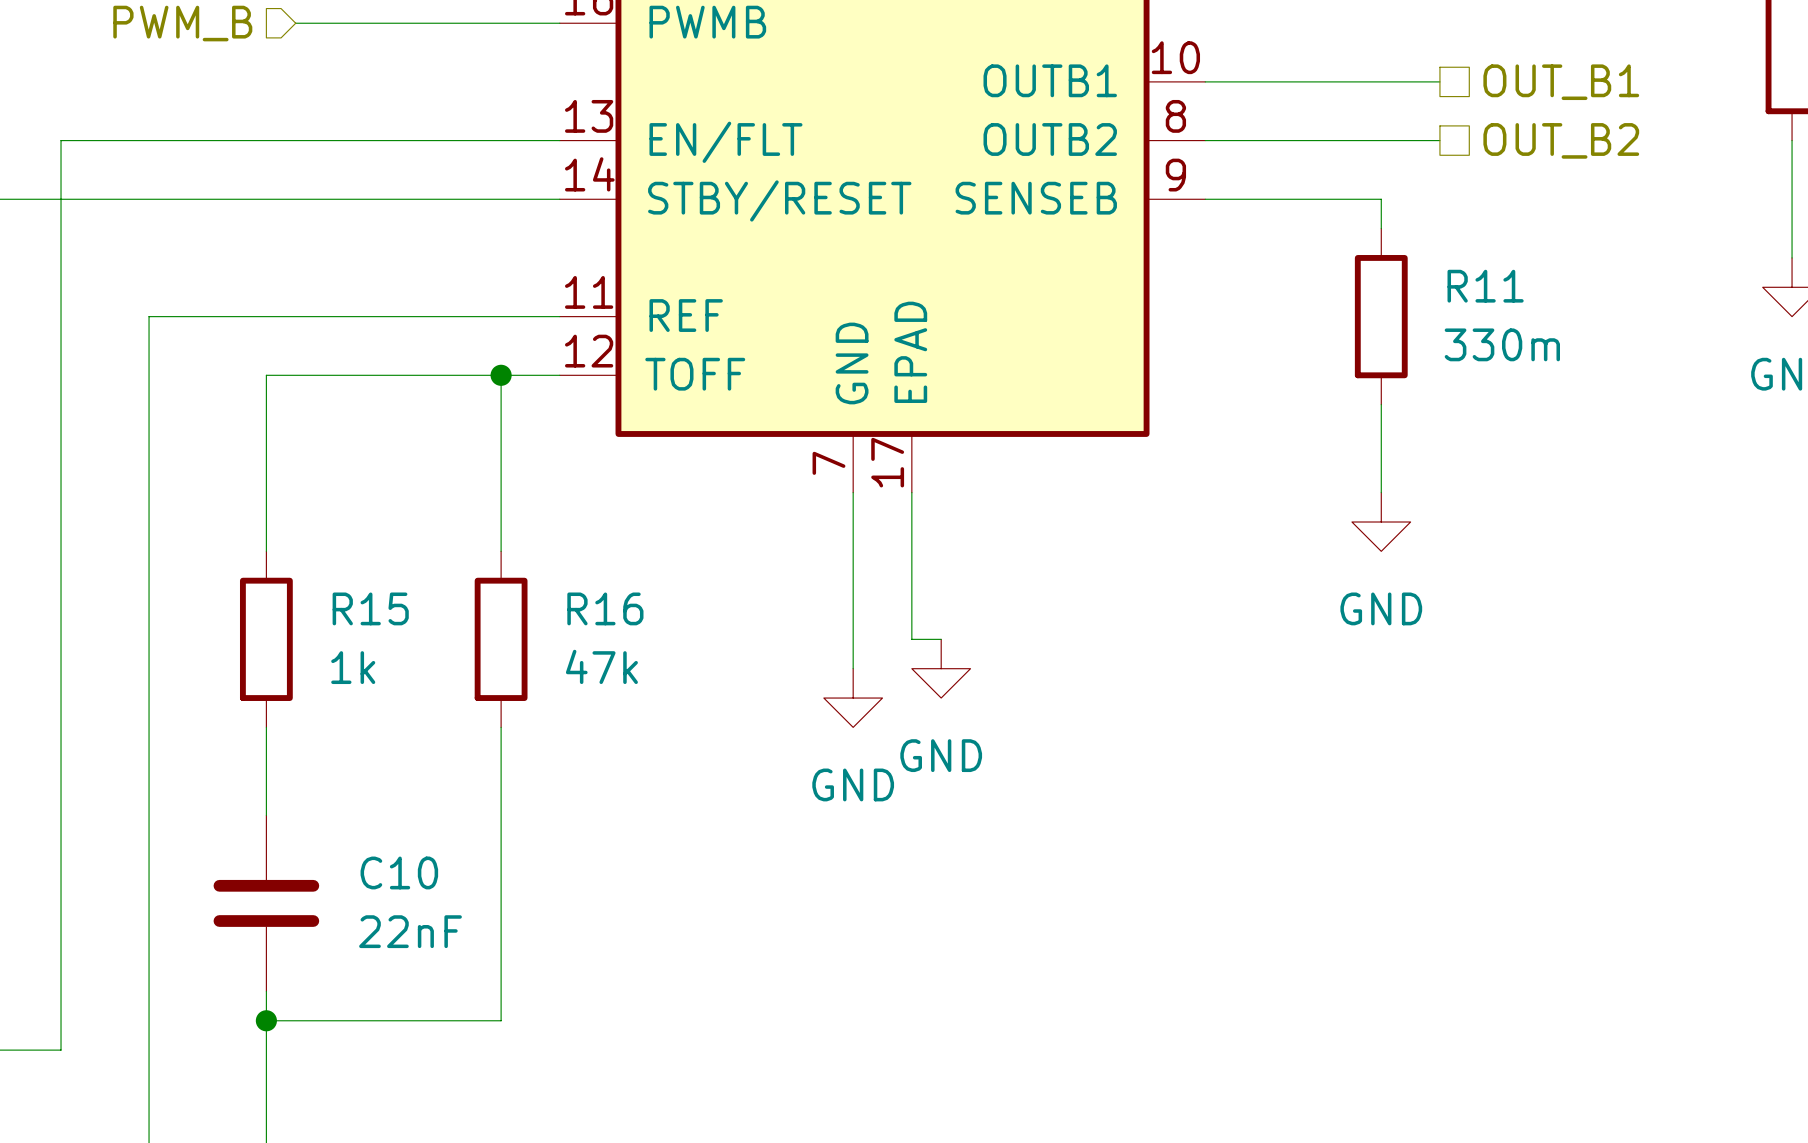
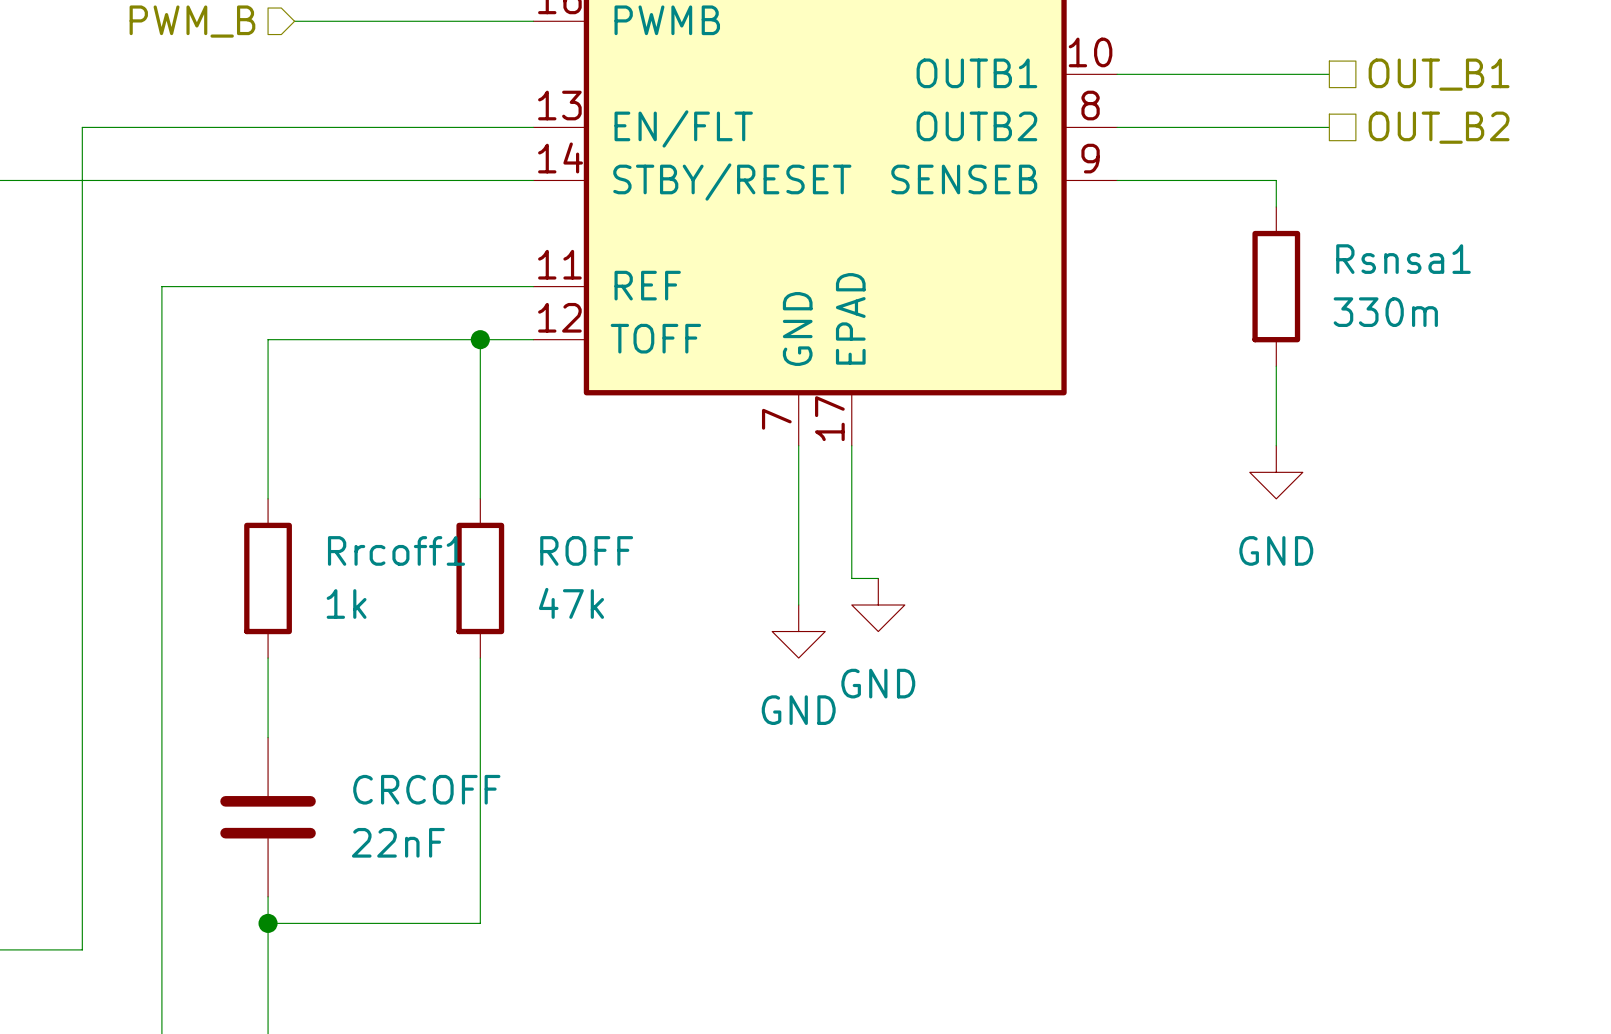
R11 name: R11 (1485, 286) -> Rsnsa1 (1403, 259)
R15 name: R15 (370, 608) -> Rrcoff1 (396, 550)
R16 name: R16 (605, 608) -> ROFF (586, 550)
C10 name: C10 (399, 872) -> CRCOFF (426, 789)

